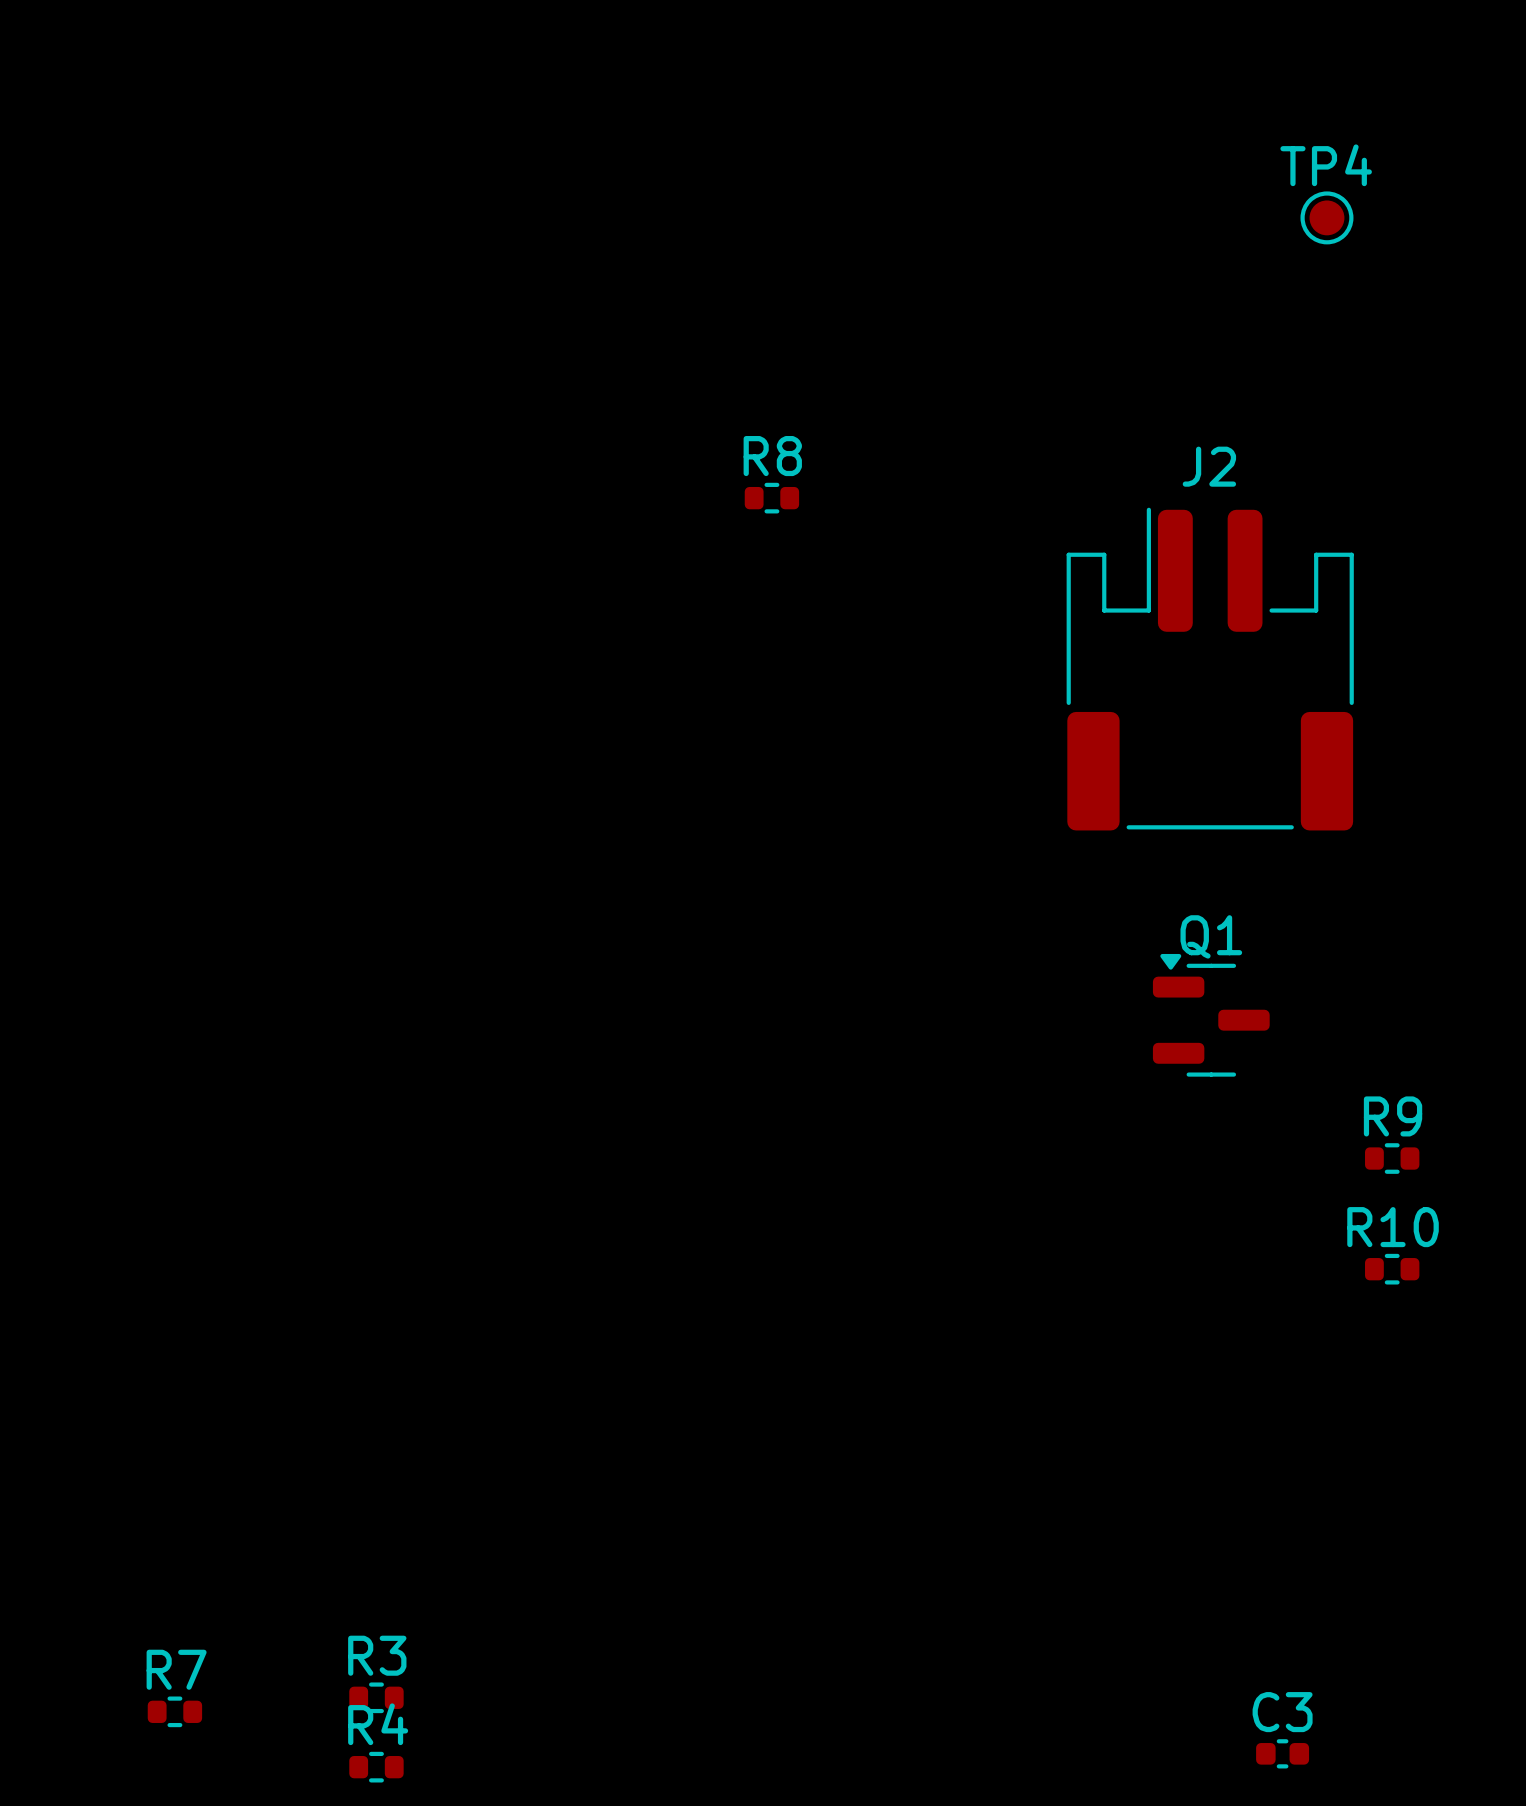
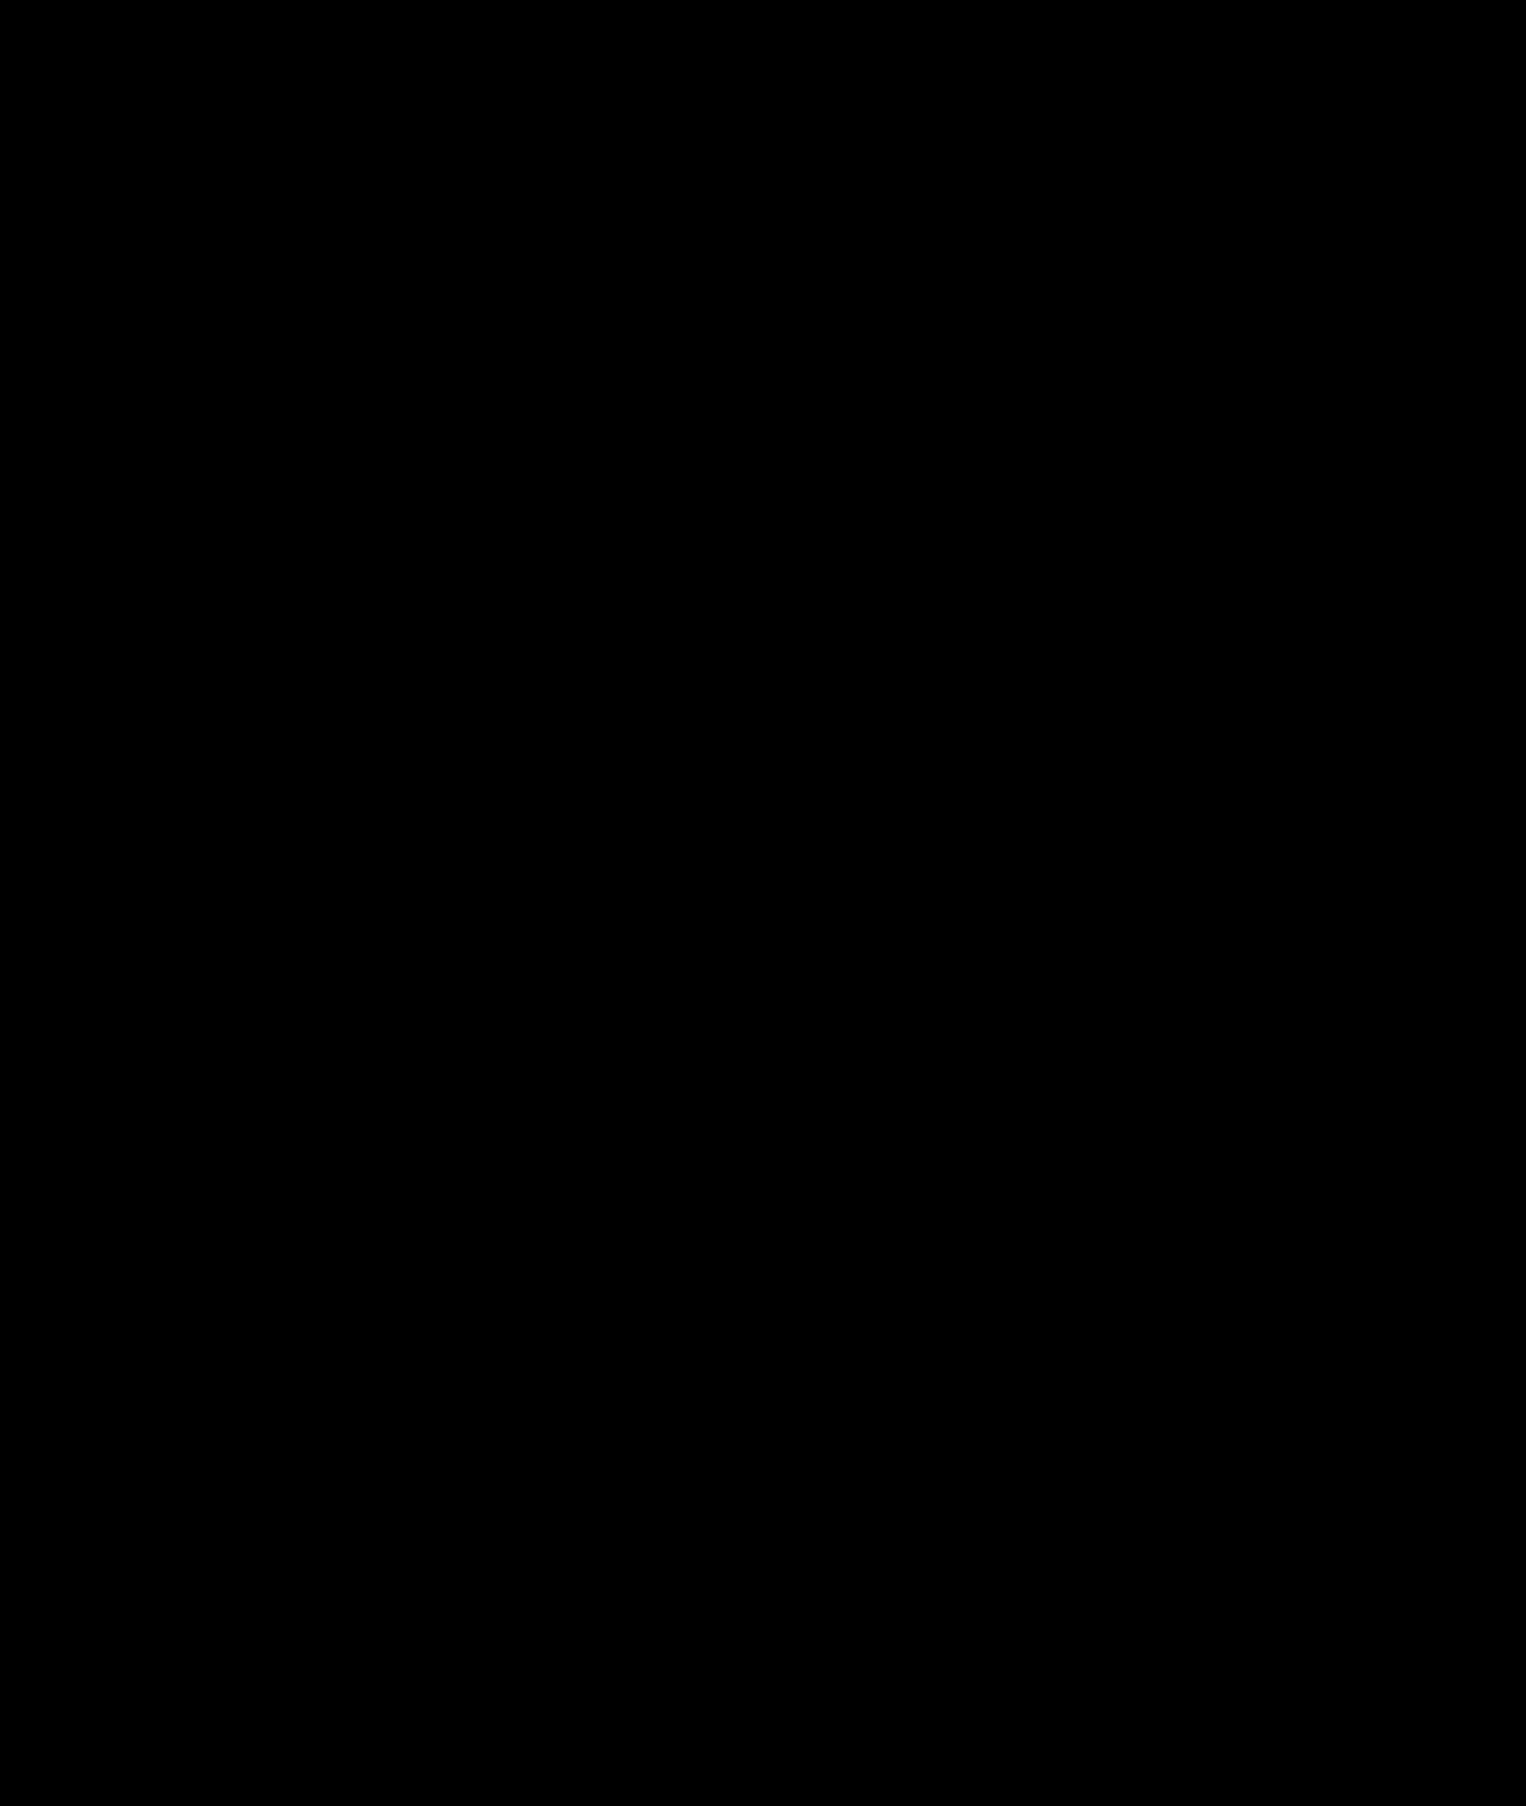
TP4: (1326, 217) -> none
R8: (771, 498) -> none
J2: (1210, 669) -> none
Q1: (1211, 1015) -> none
R9: (1392, 1158) -> none
R10: (1392, 1269) -> none
R3: (376, 1697) -> none
R7: (174, 1711) -> none
C3: (1282, 1753) -> none
R4: (376, 1767) -> none

